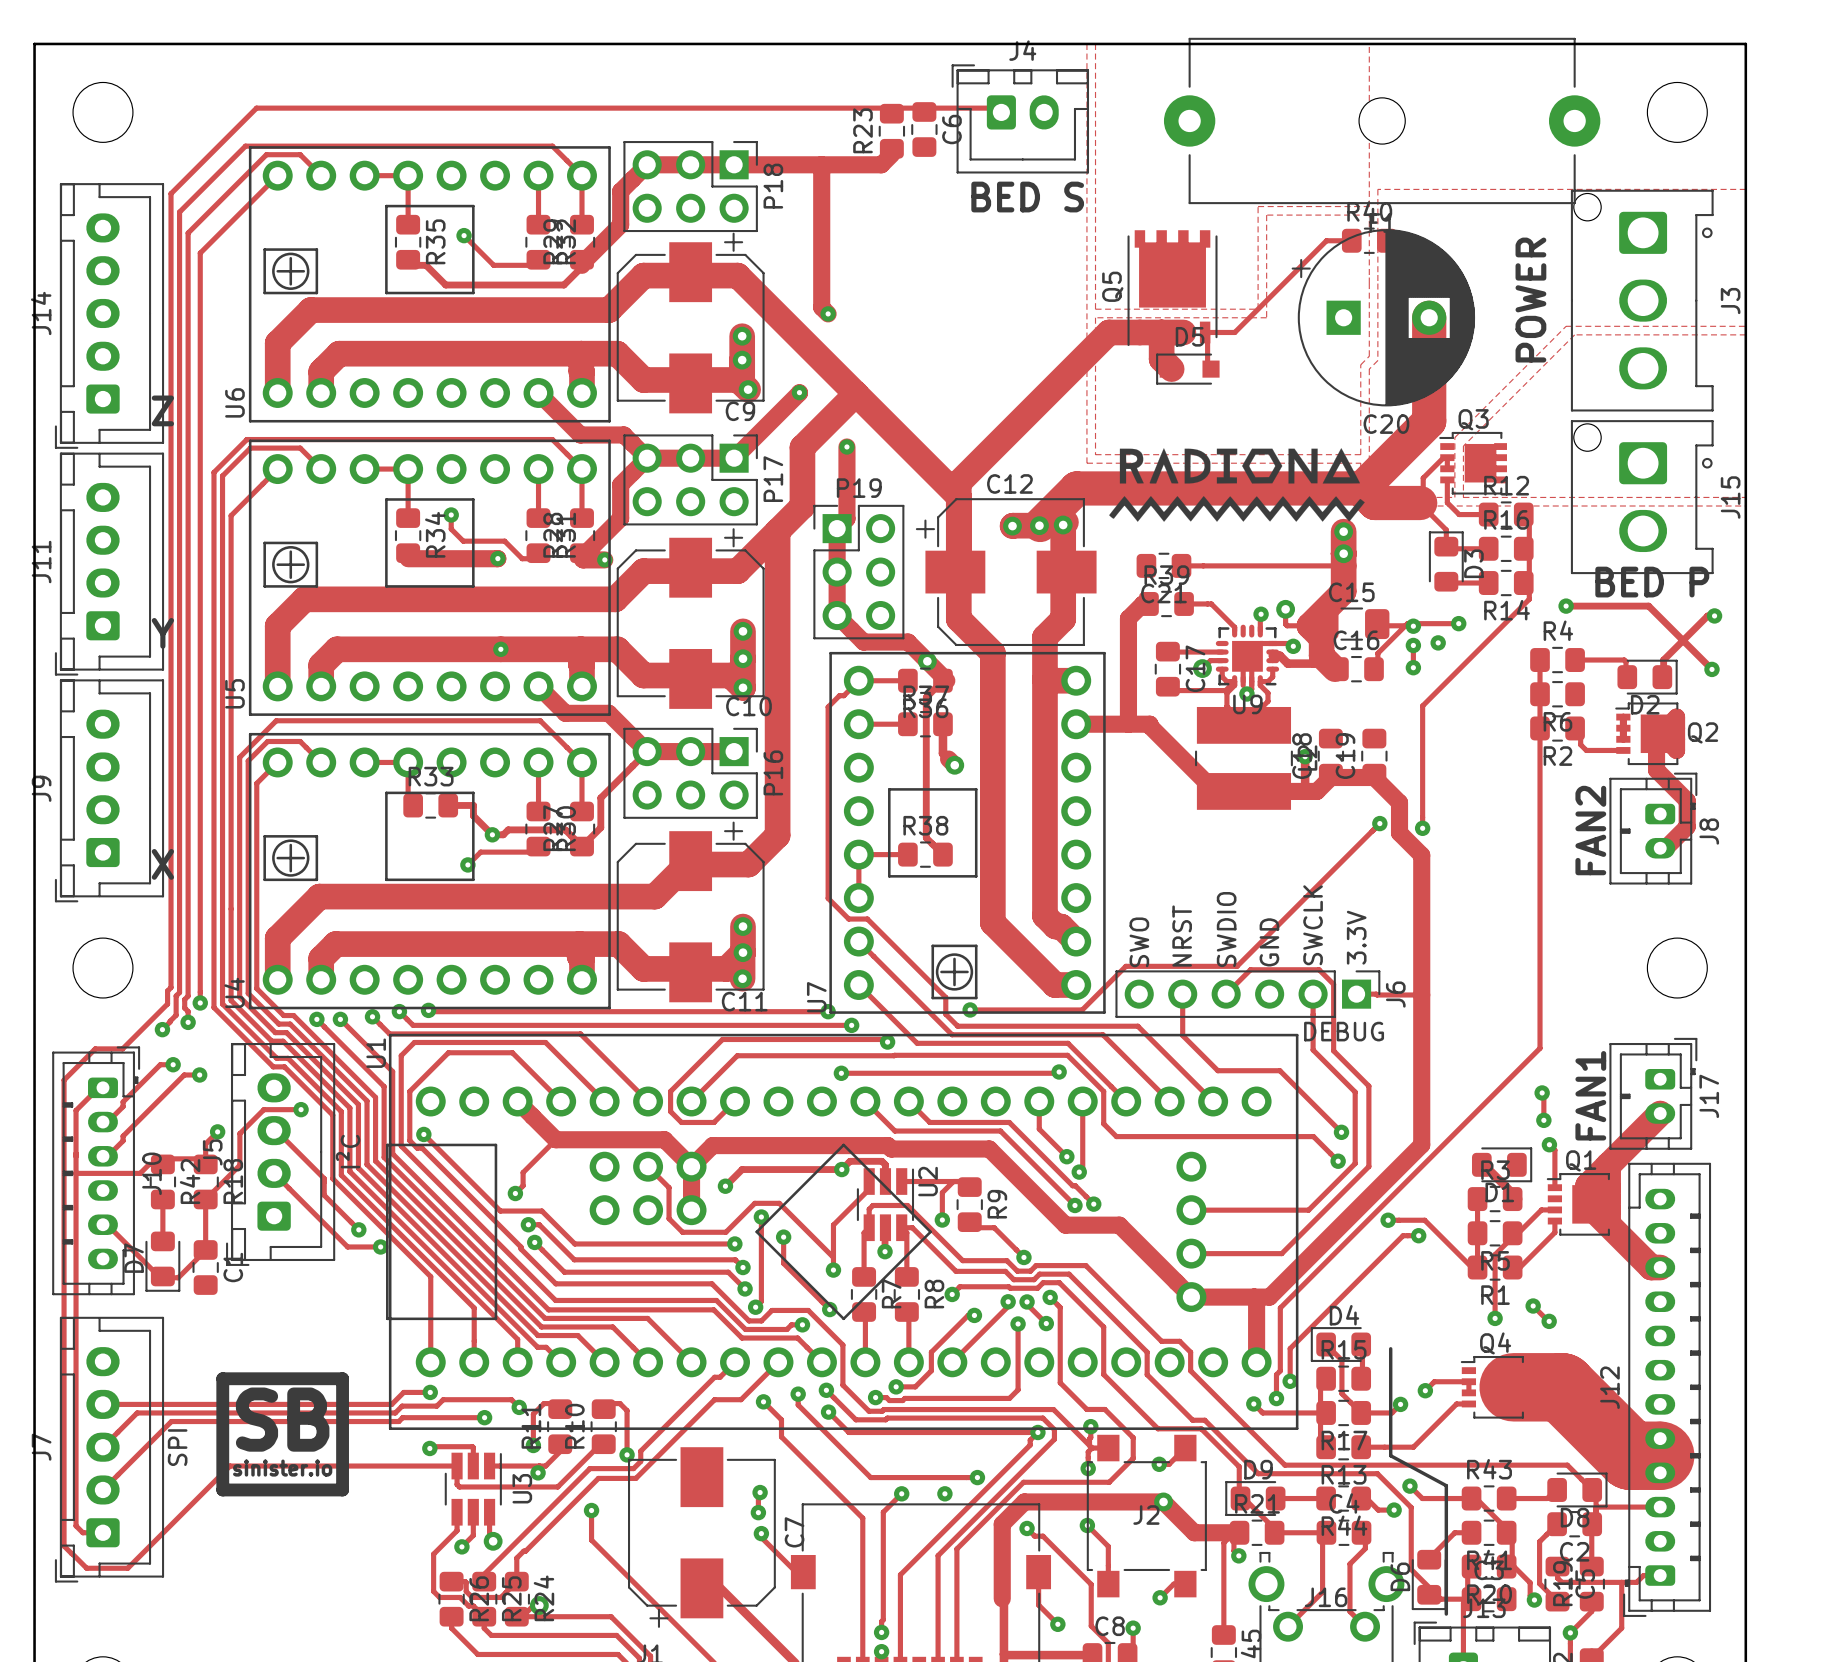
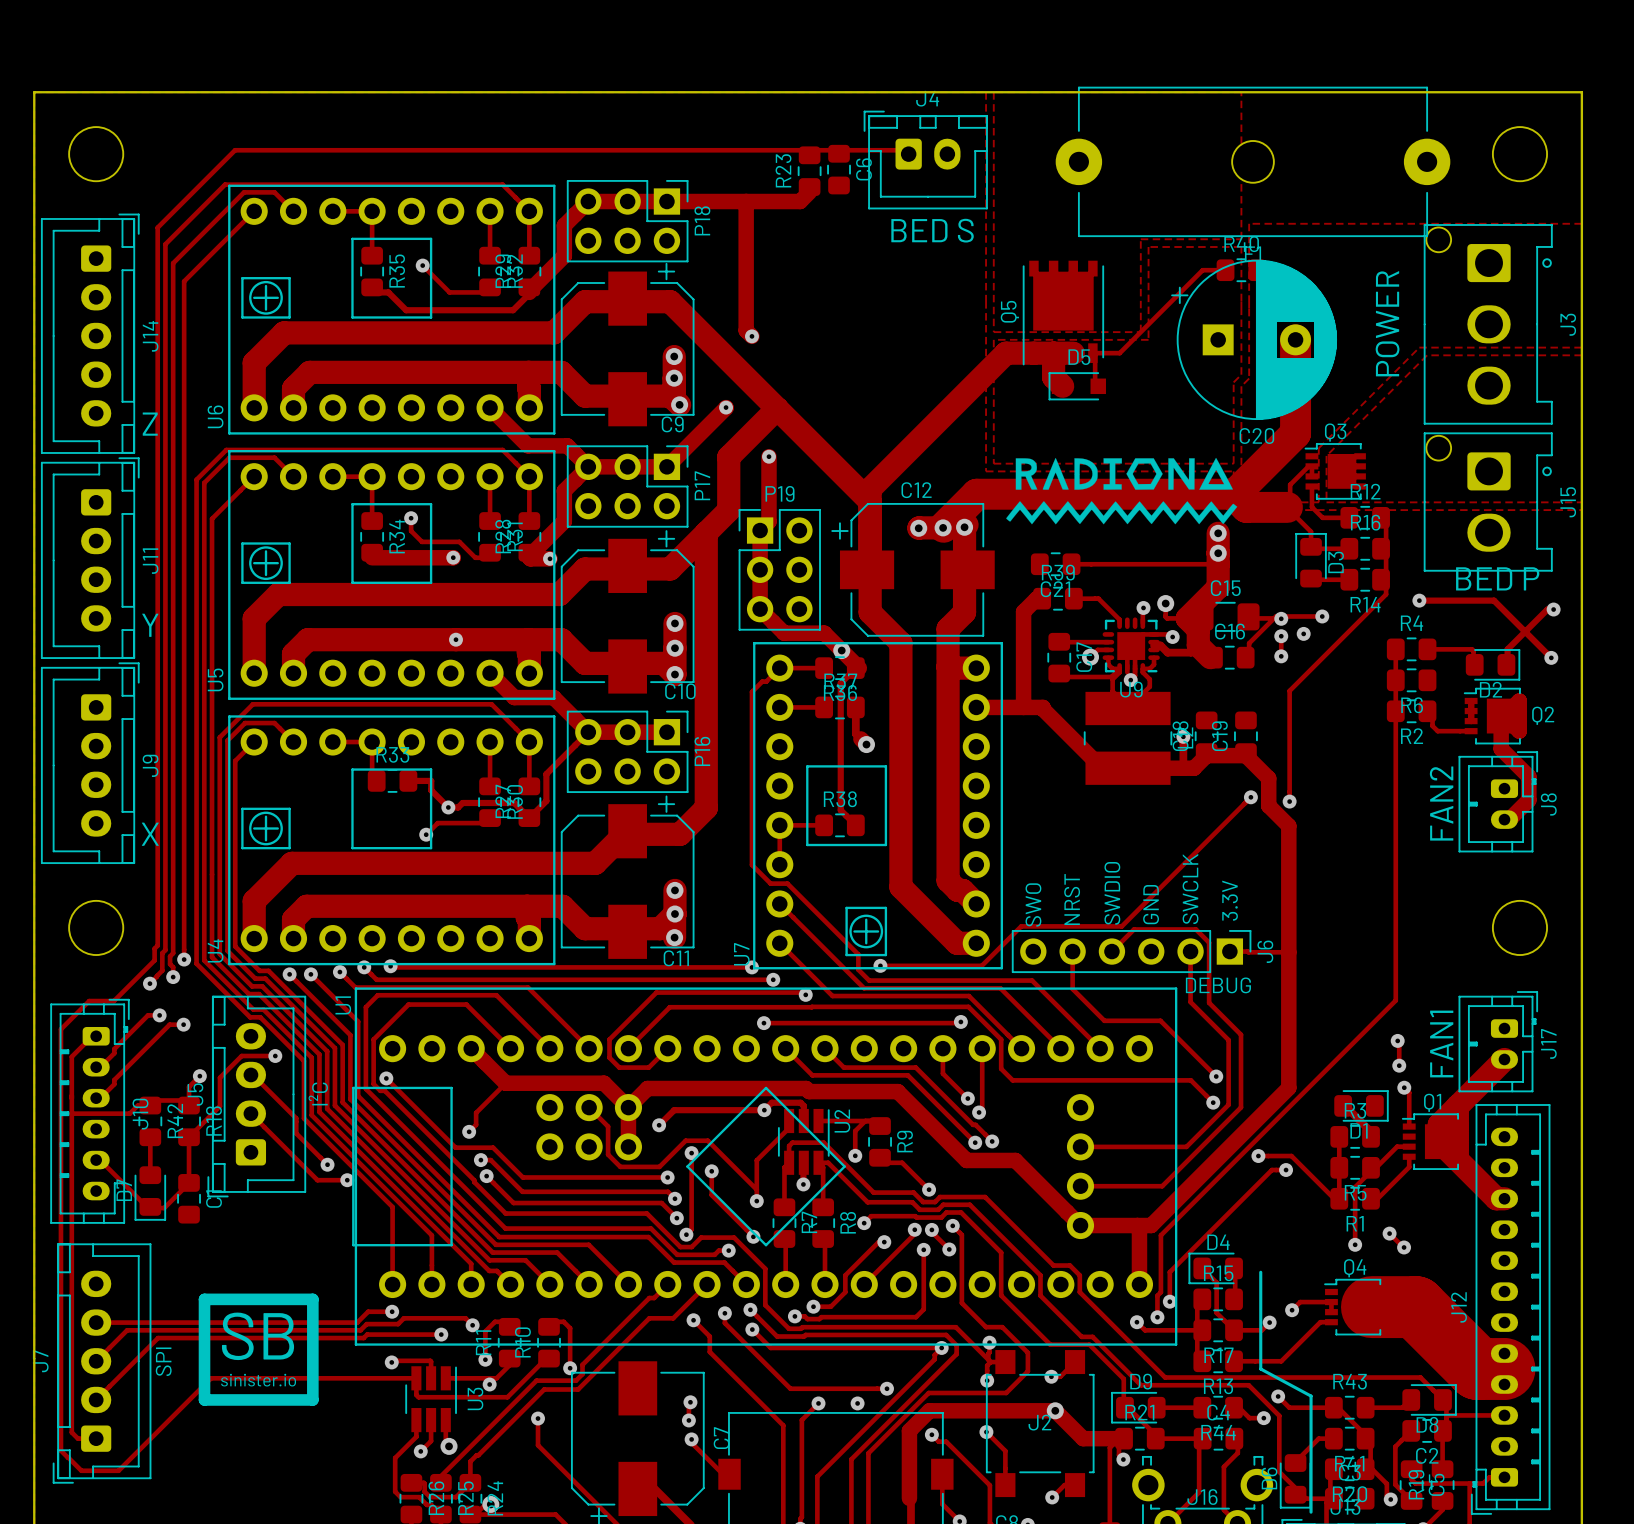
J14 rotation: 0° (109, 315) -> 180° (90, 333)
J11 rotation: 0° (109, 564) -> 180° (90, 558)
J9 rotation: 0° (109, 790) -> 180° (90, 763)

